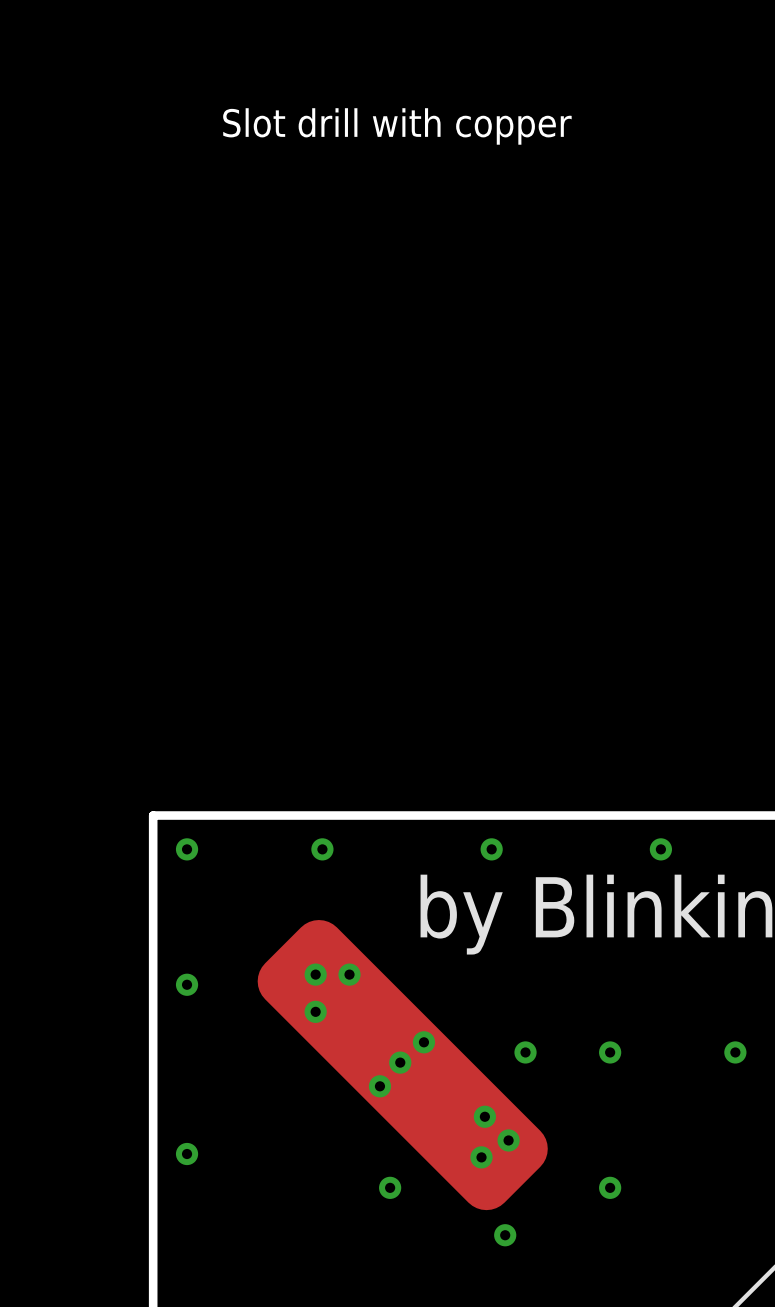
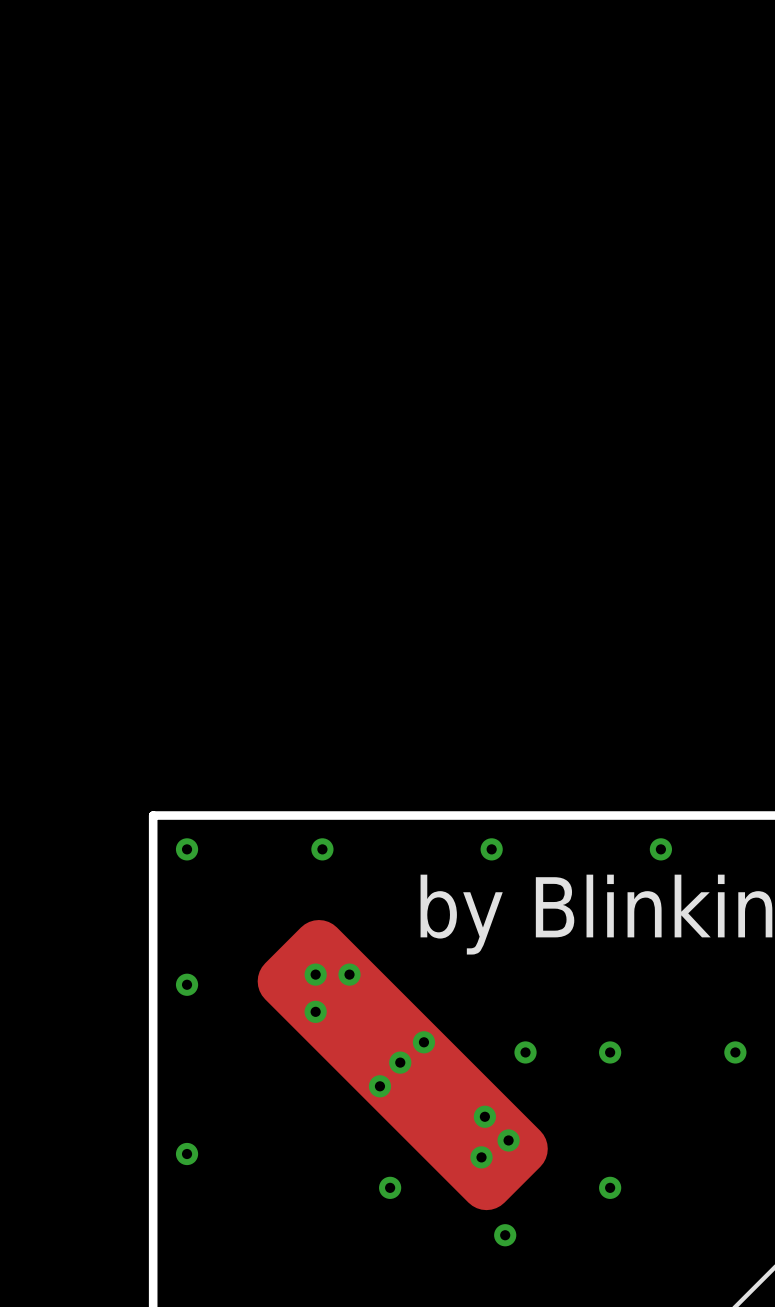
text: Slot drill with copper (397, 126) -> none

